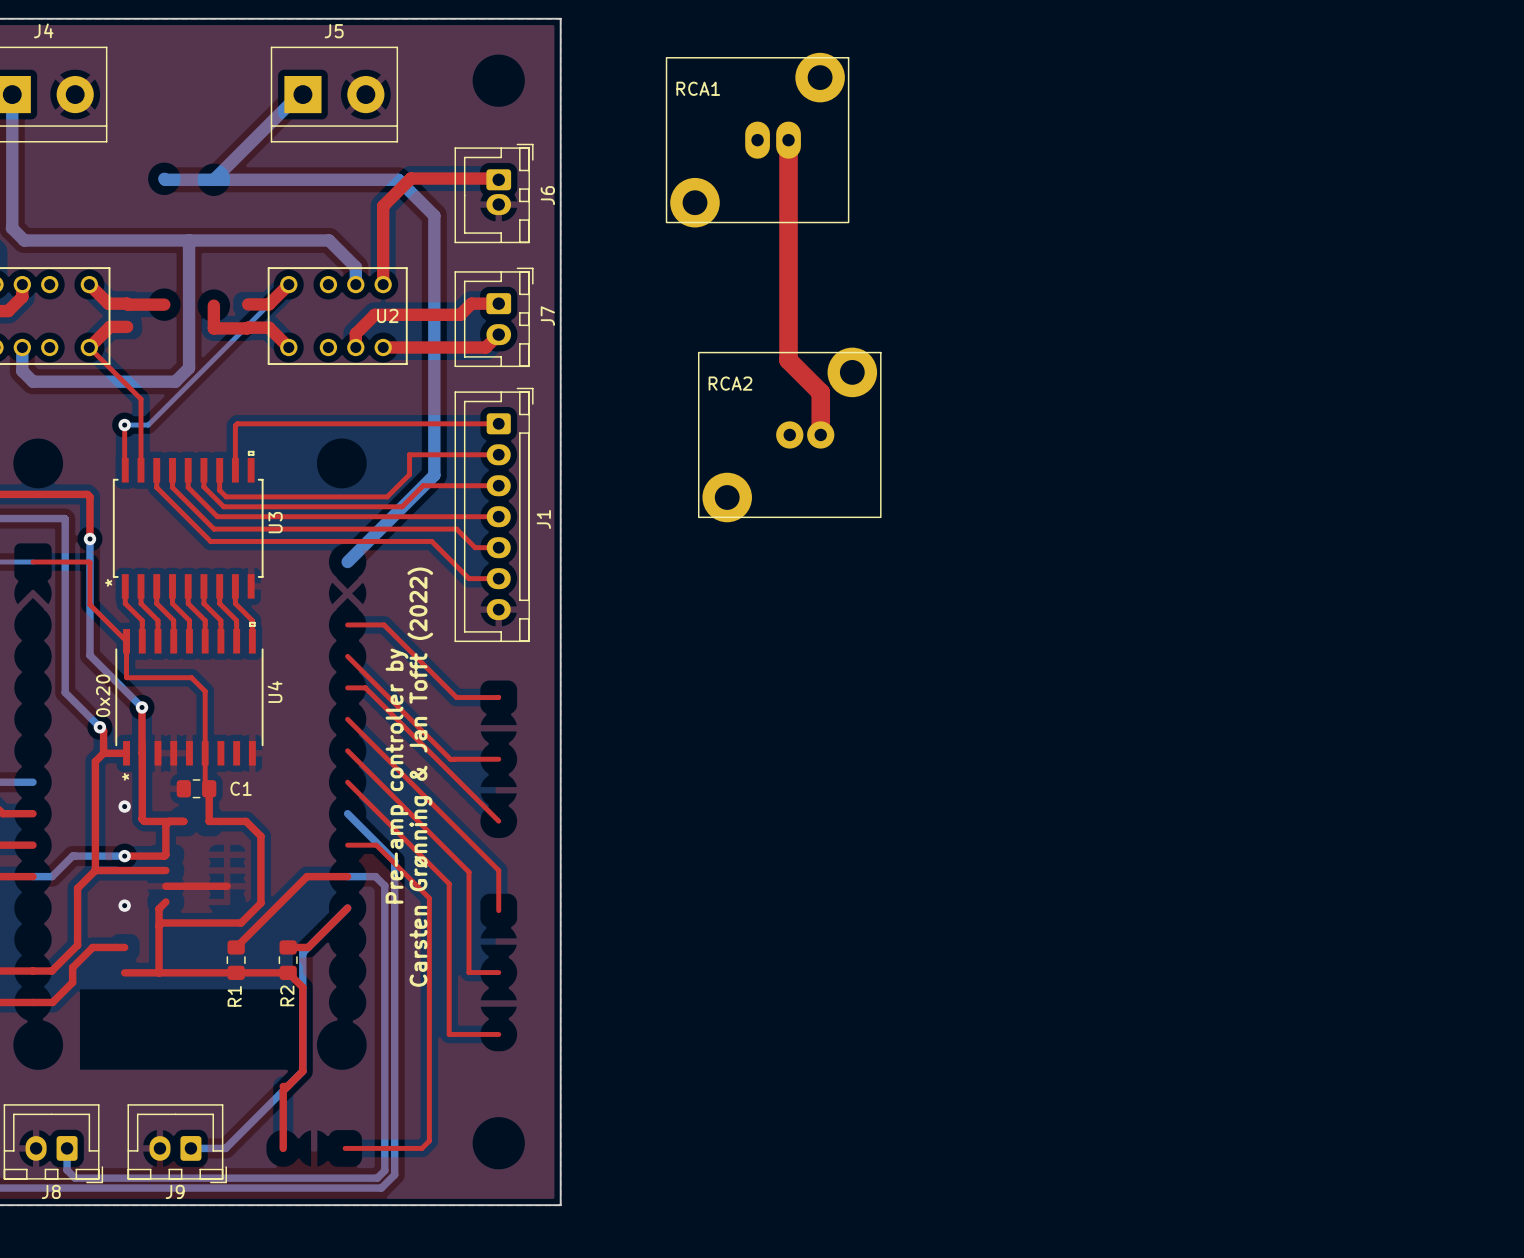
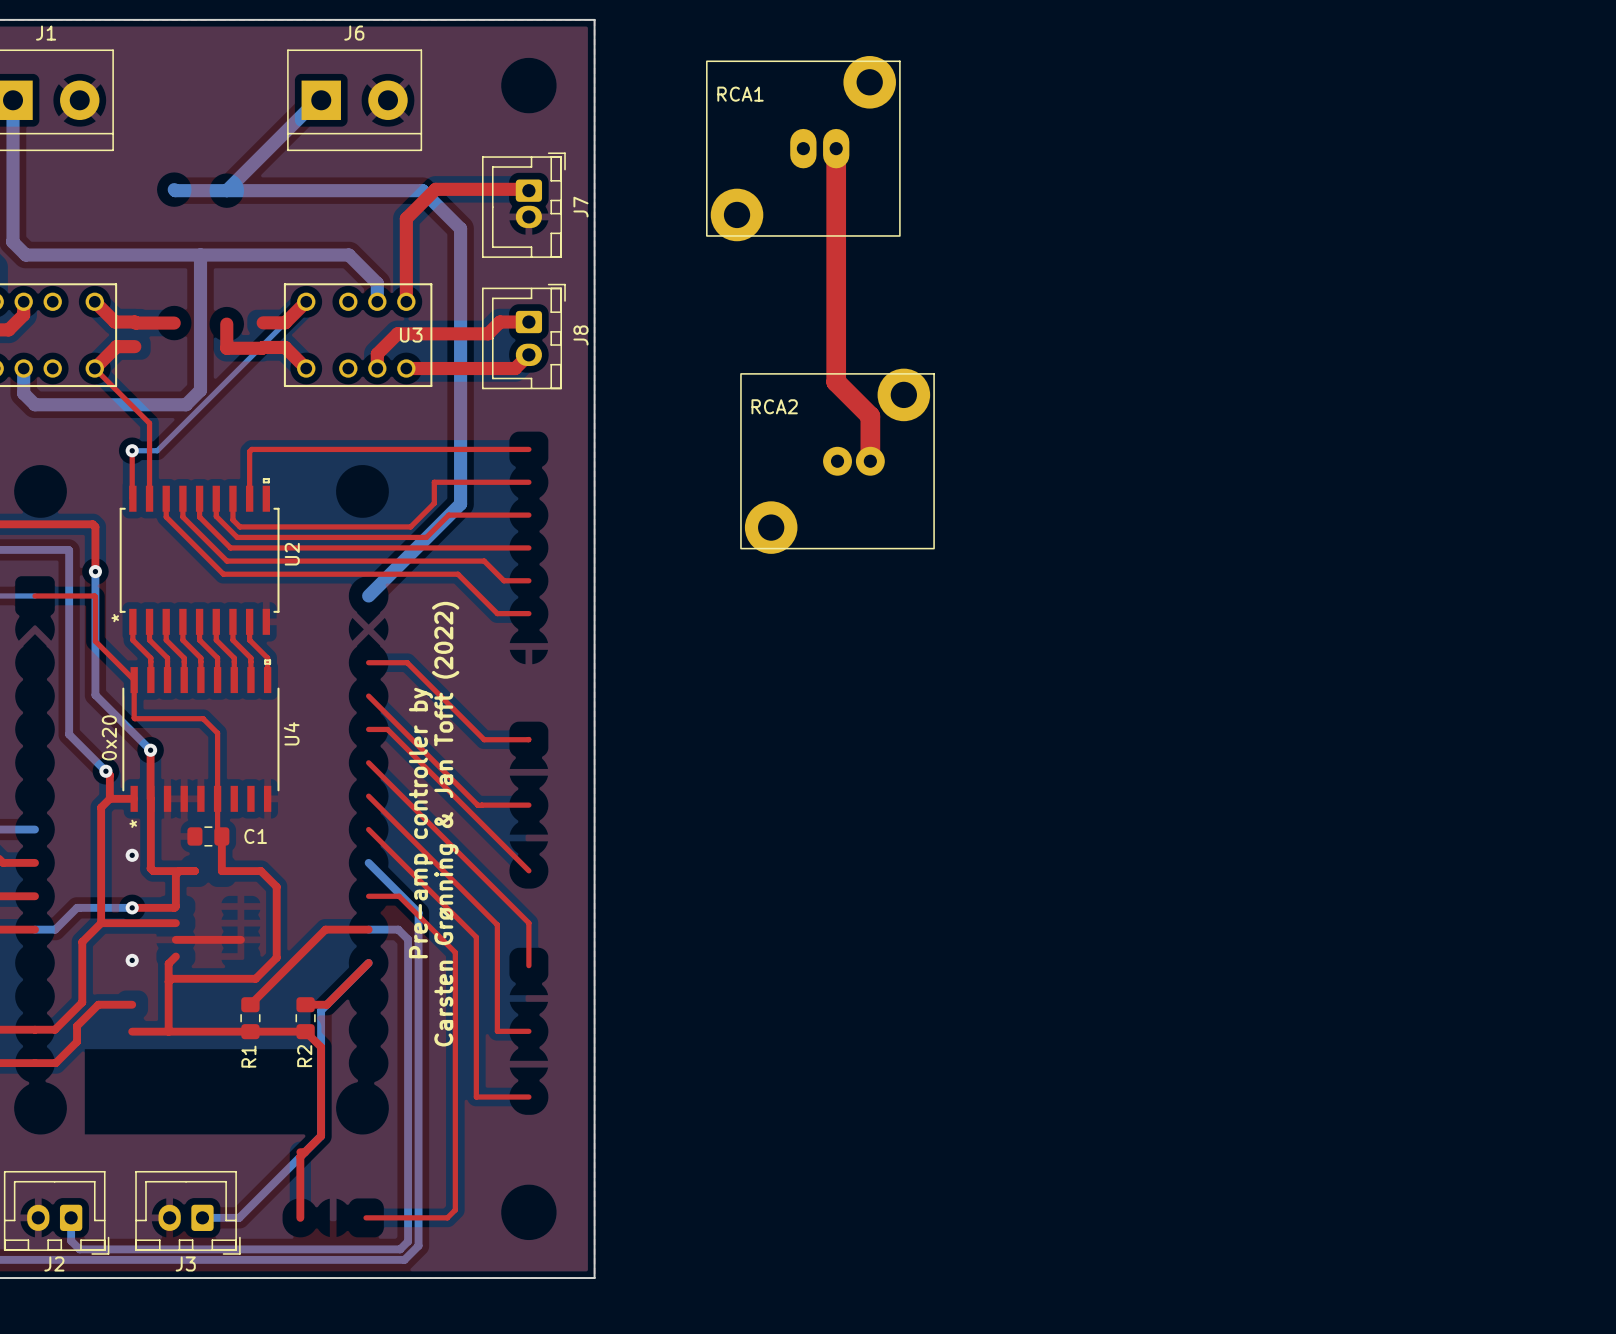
J4 name: J4 (43, 30) -> J1 (46, 33)
J5 name: J5 (334, 31) -> J6 (354, 33)
J6 name: J6 (547, 195) -> J7 (580, 207)
U2 name: U2 (387, 315) -> U3 (411, 335)
J7 name: J7 (547, 316) -> J8 (580, 335)
J1: (494, 514) -> none
U3 name: U3 (275, 522) -> U2 (292, 554)
J8 name: J8 (51, 1191) -> J2 (54, 1264)
J9 name: J9 (175, 1191) -> J3 (185, 1264)

